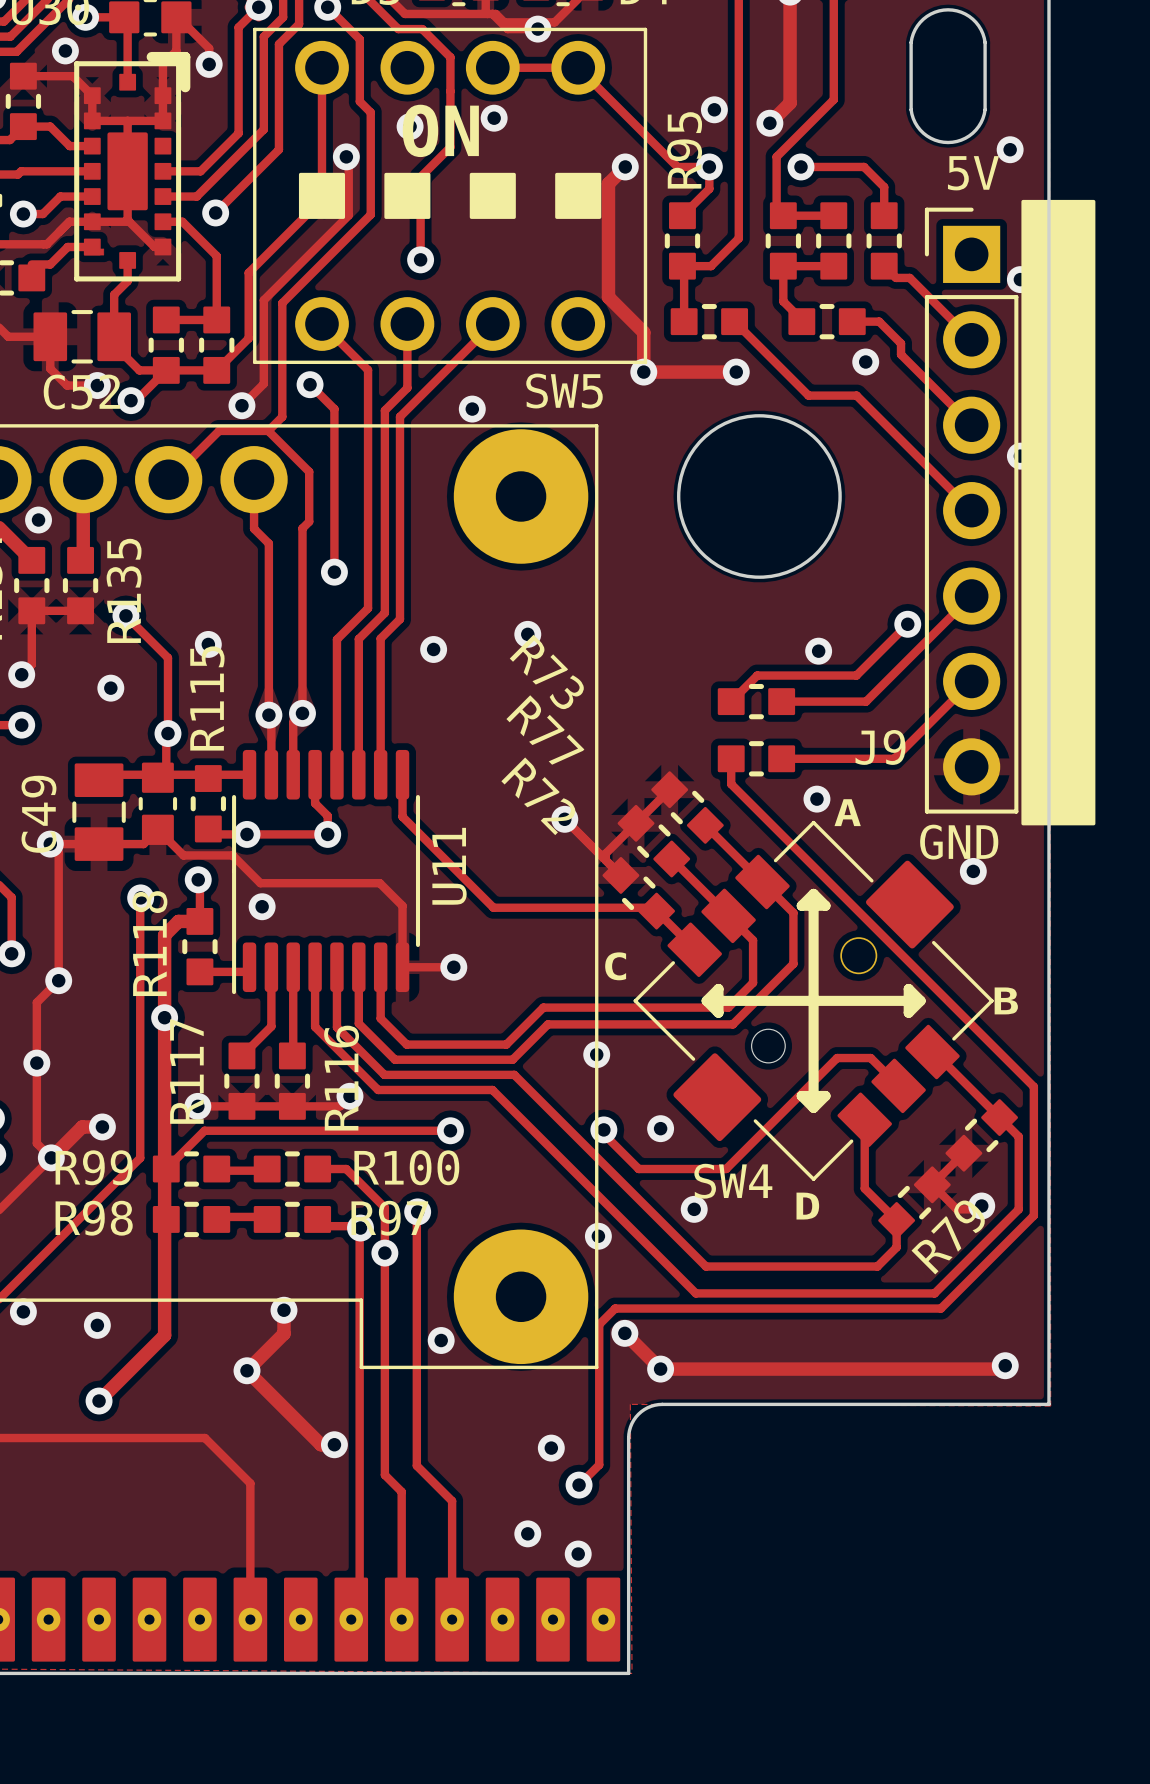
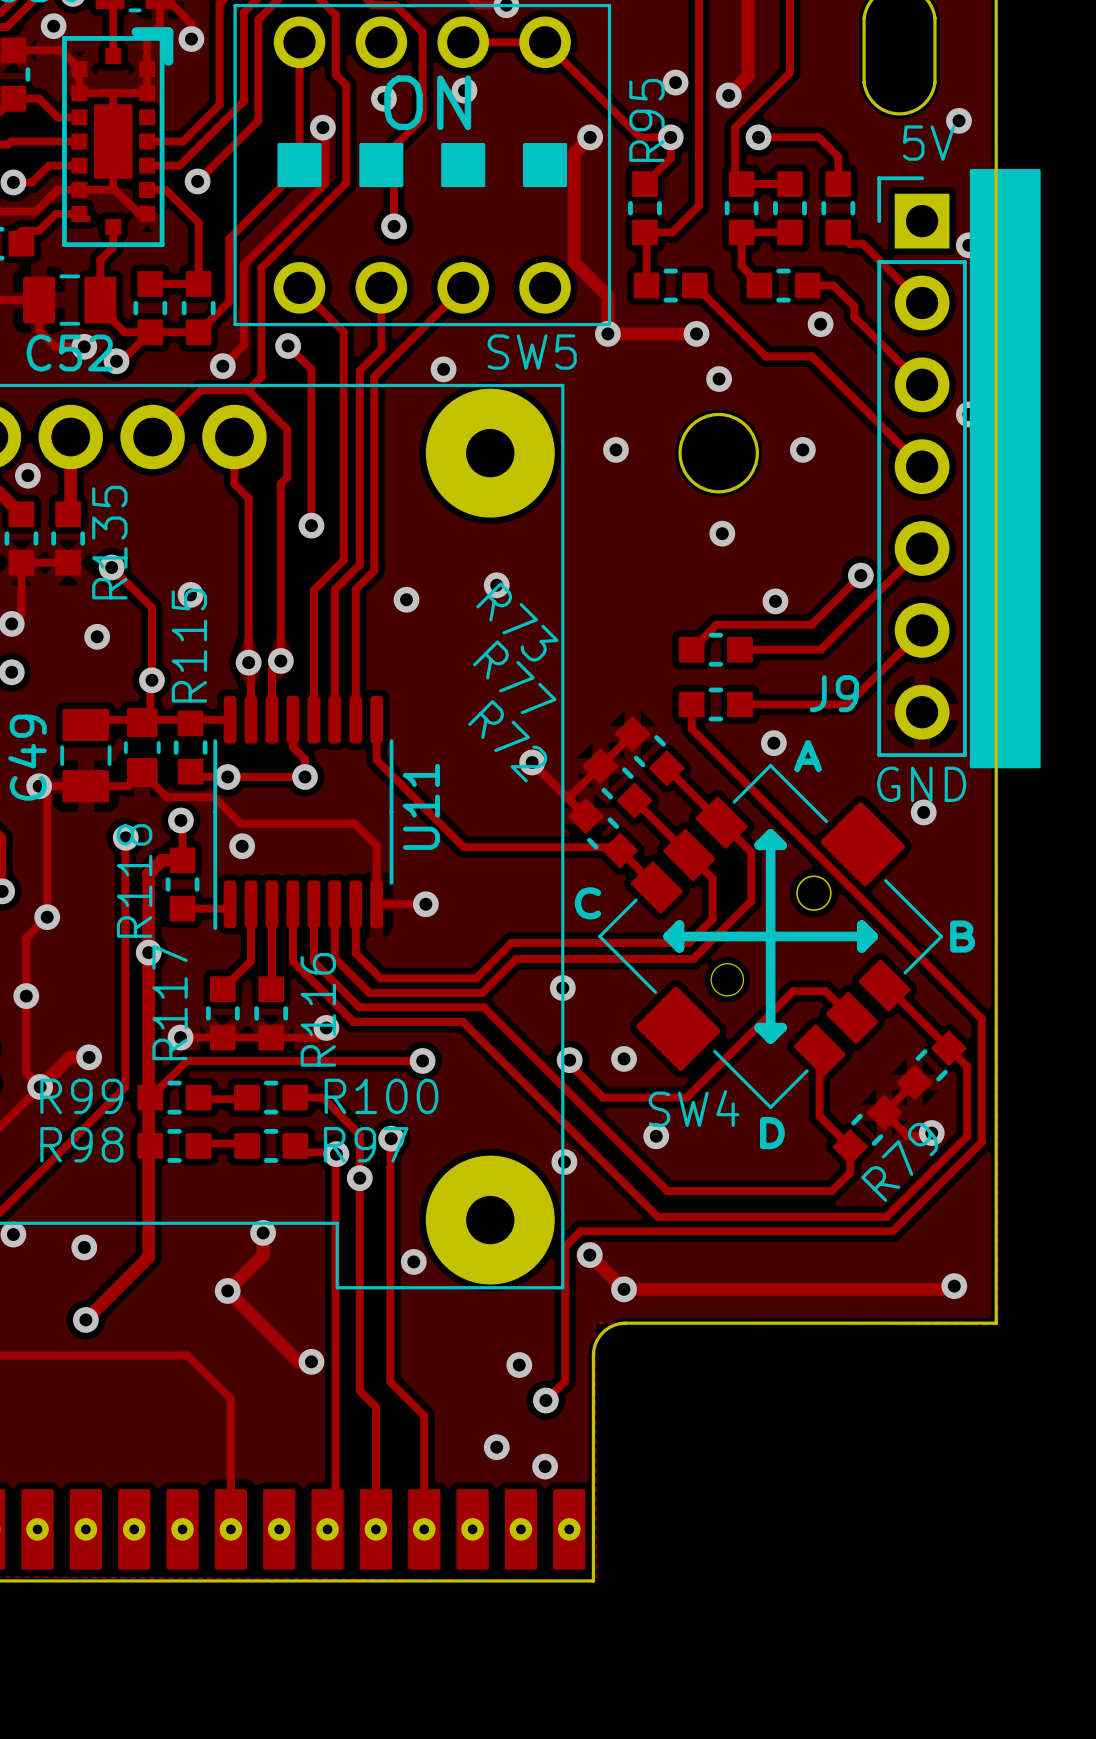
round board edge size: [677, 414, 842, 579] -> [678, 412, 759, 494]
via: none -> (719, 379)
via: none -> (615, 449)
via: none -> (802, 449)
via: none -> (722, 533)

